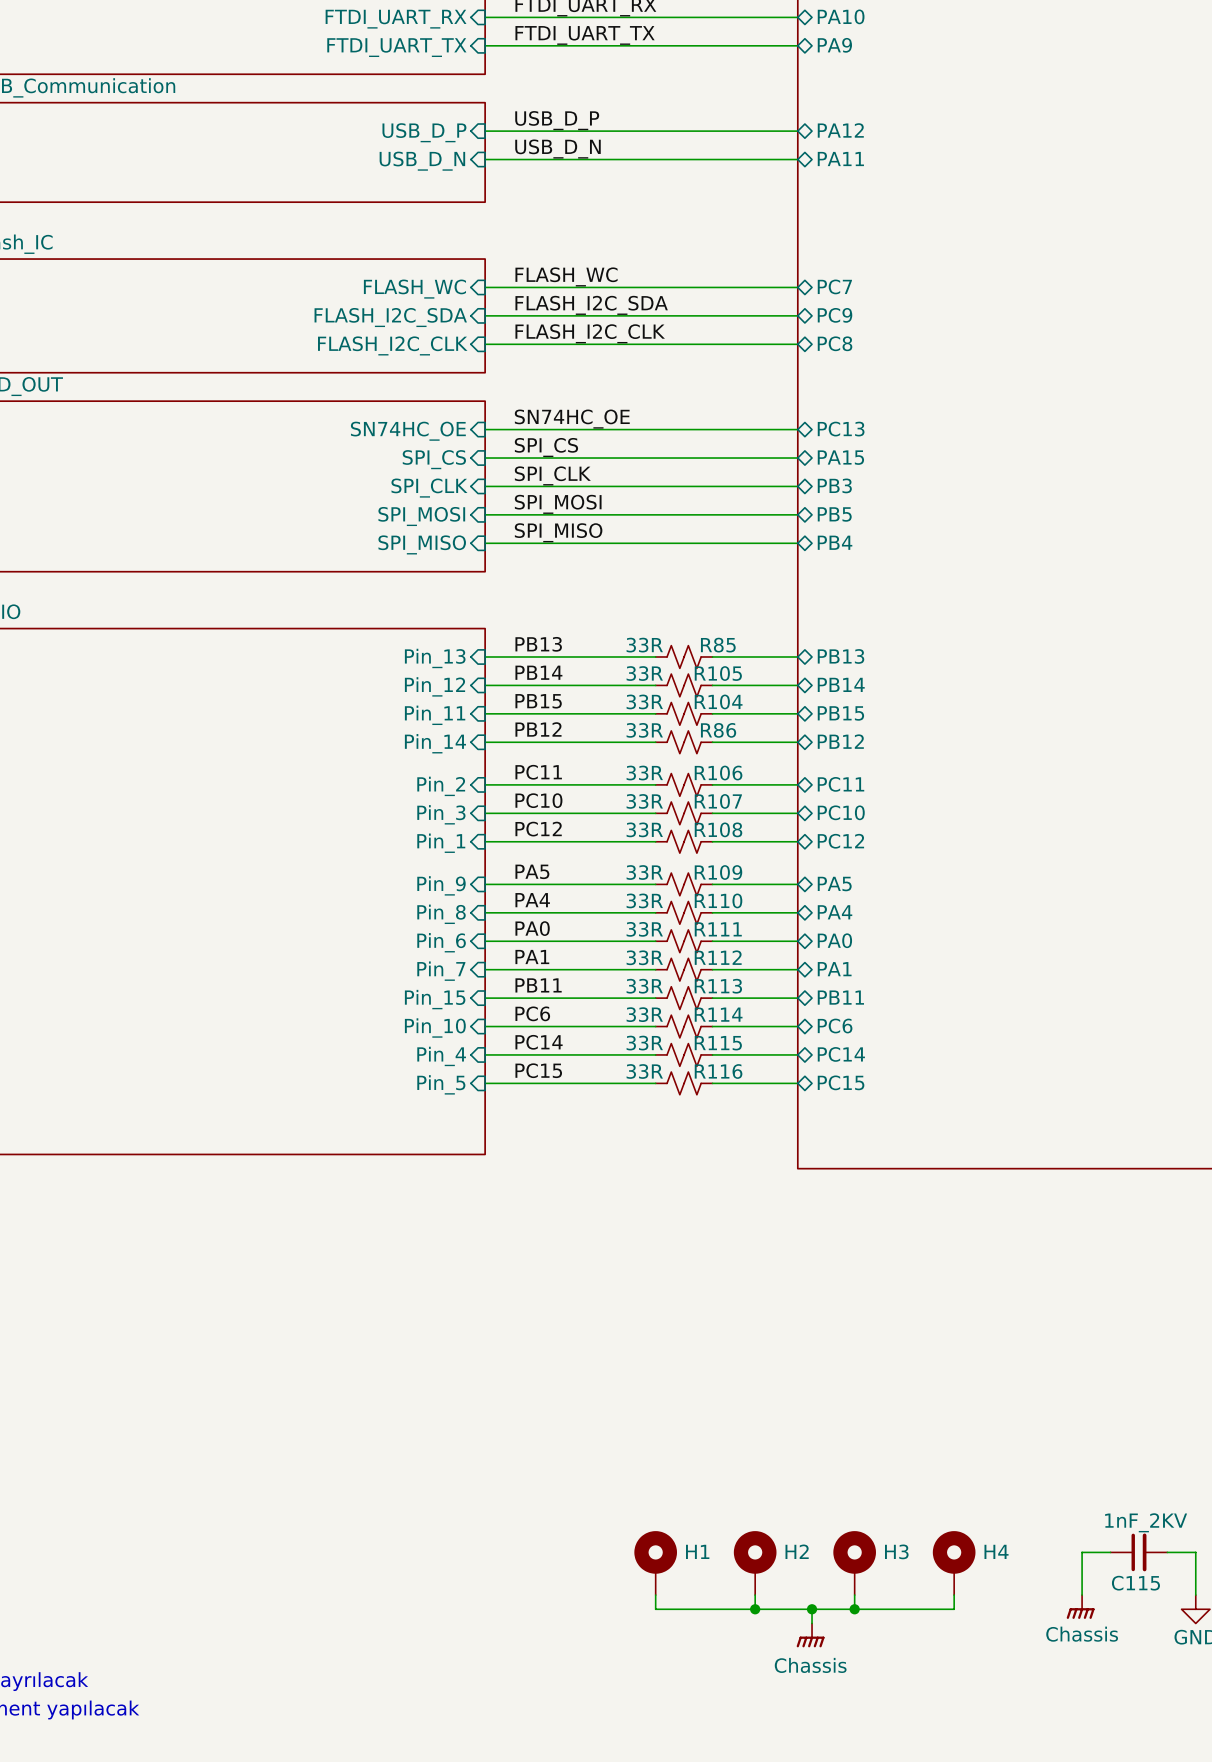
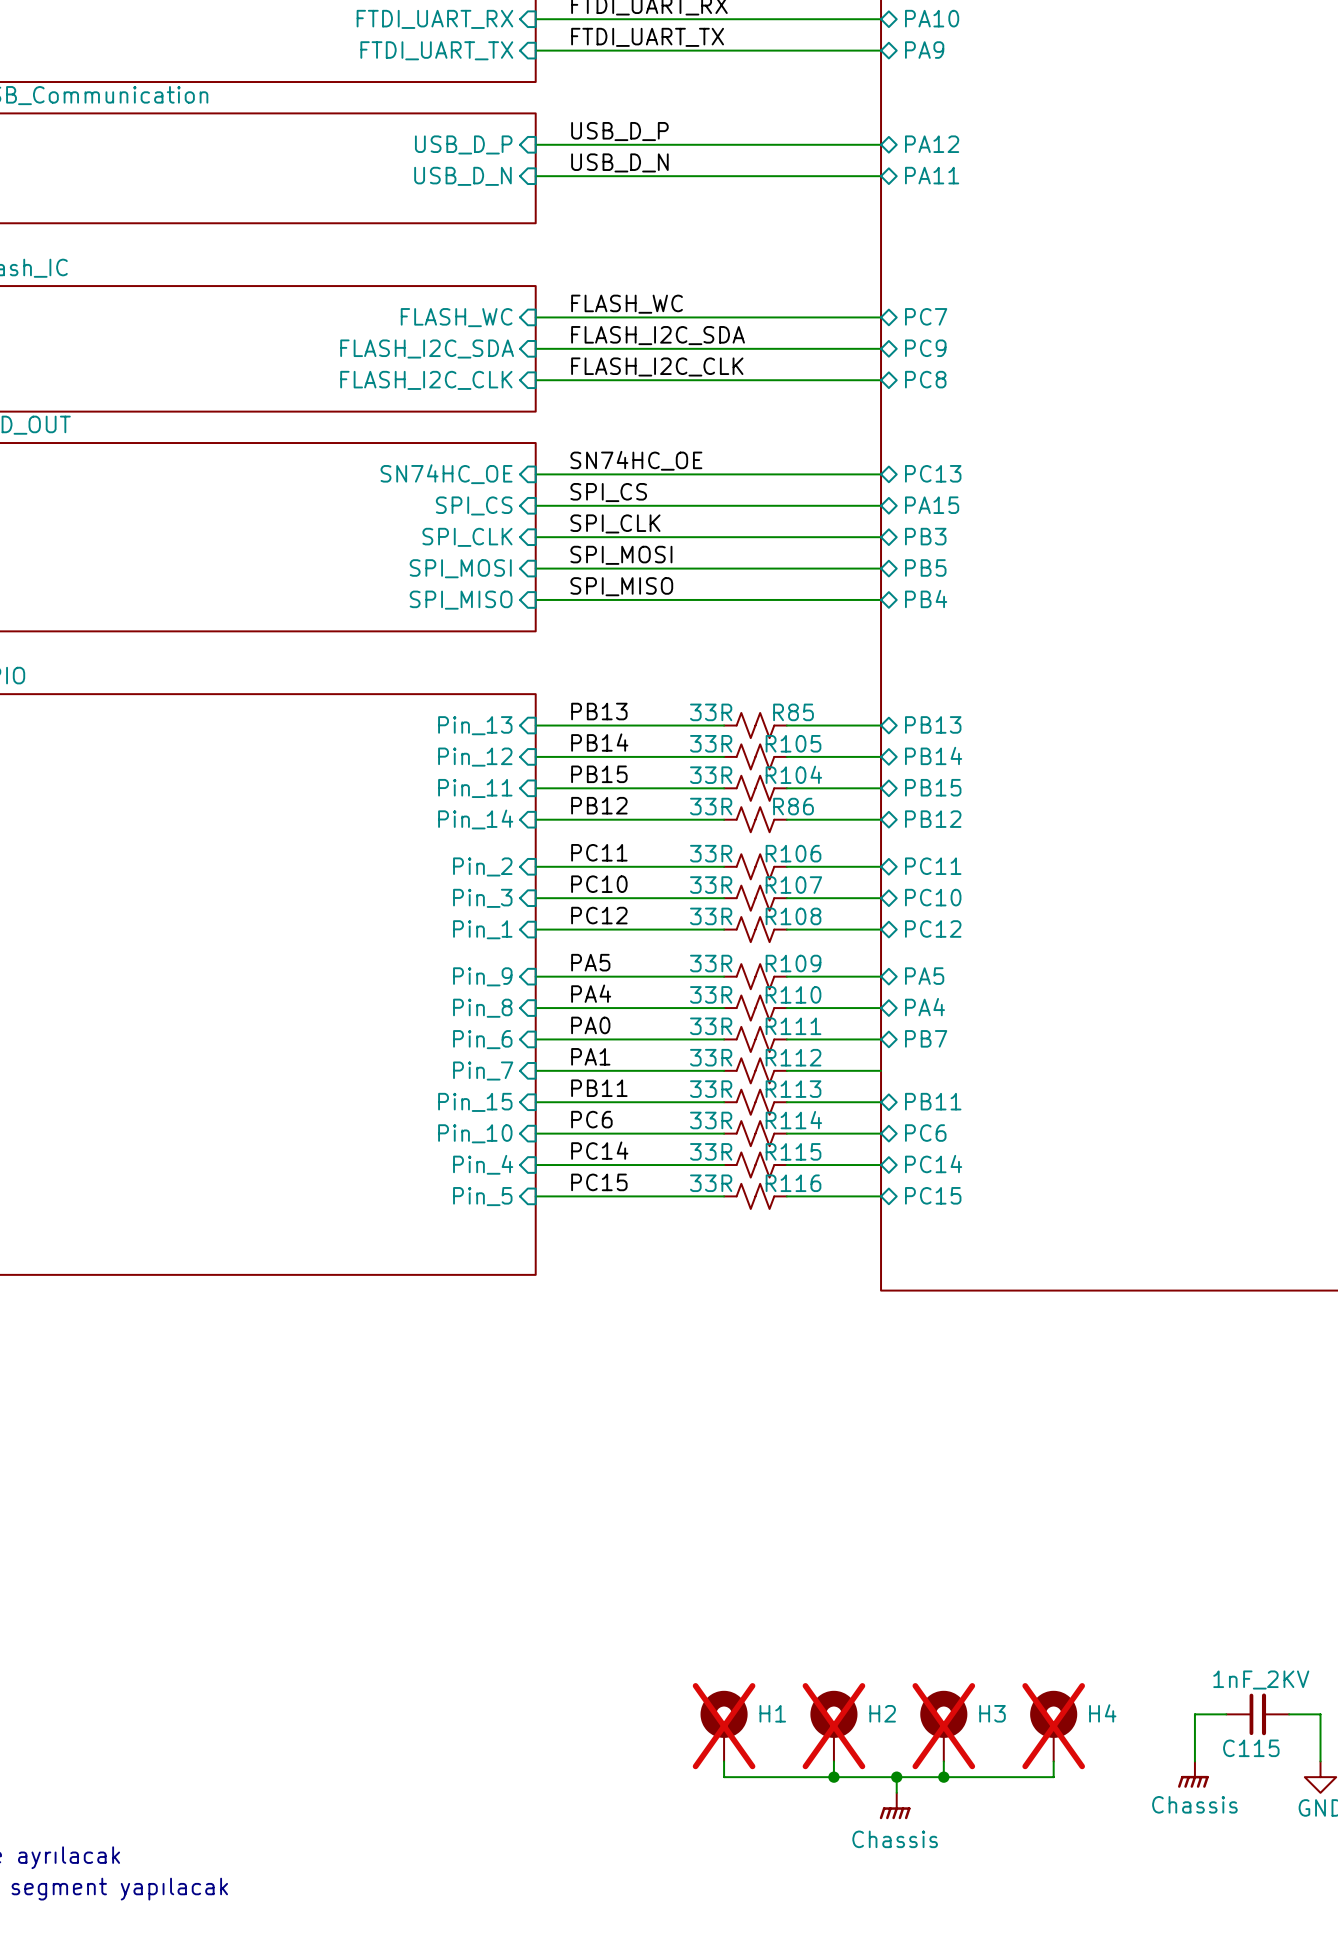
sheet pin: PA0 (834, 940) -> PB7 (926, 1038)
sheet pin: PA1 (834, 969) -> none
H1 do-not-place cross: none -> (724, 1726)
H2 do-not-place cross: none -> (833, 1726)
H3 do-not-place cross: none -> (943, 1726)
H4 do-not-place cross: none -> (1053, 1726)

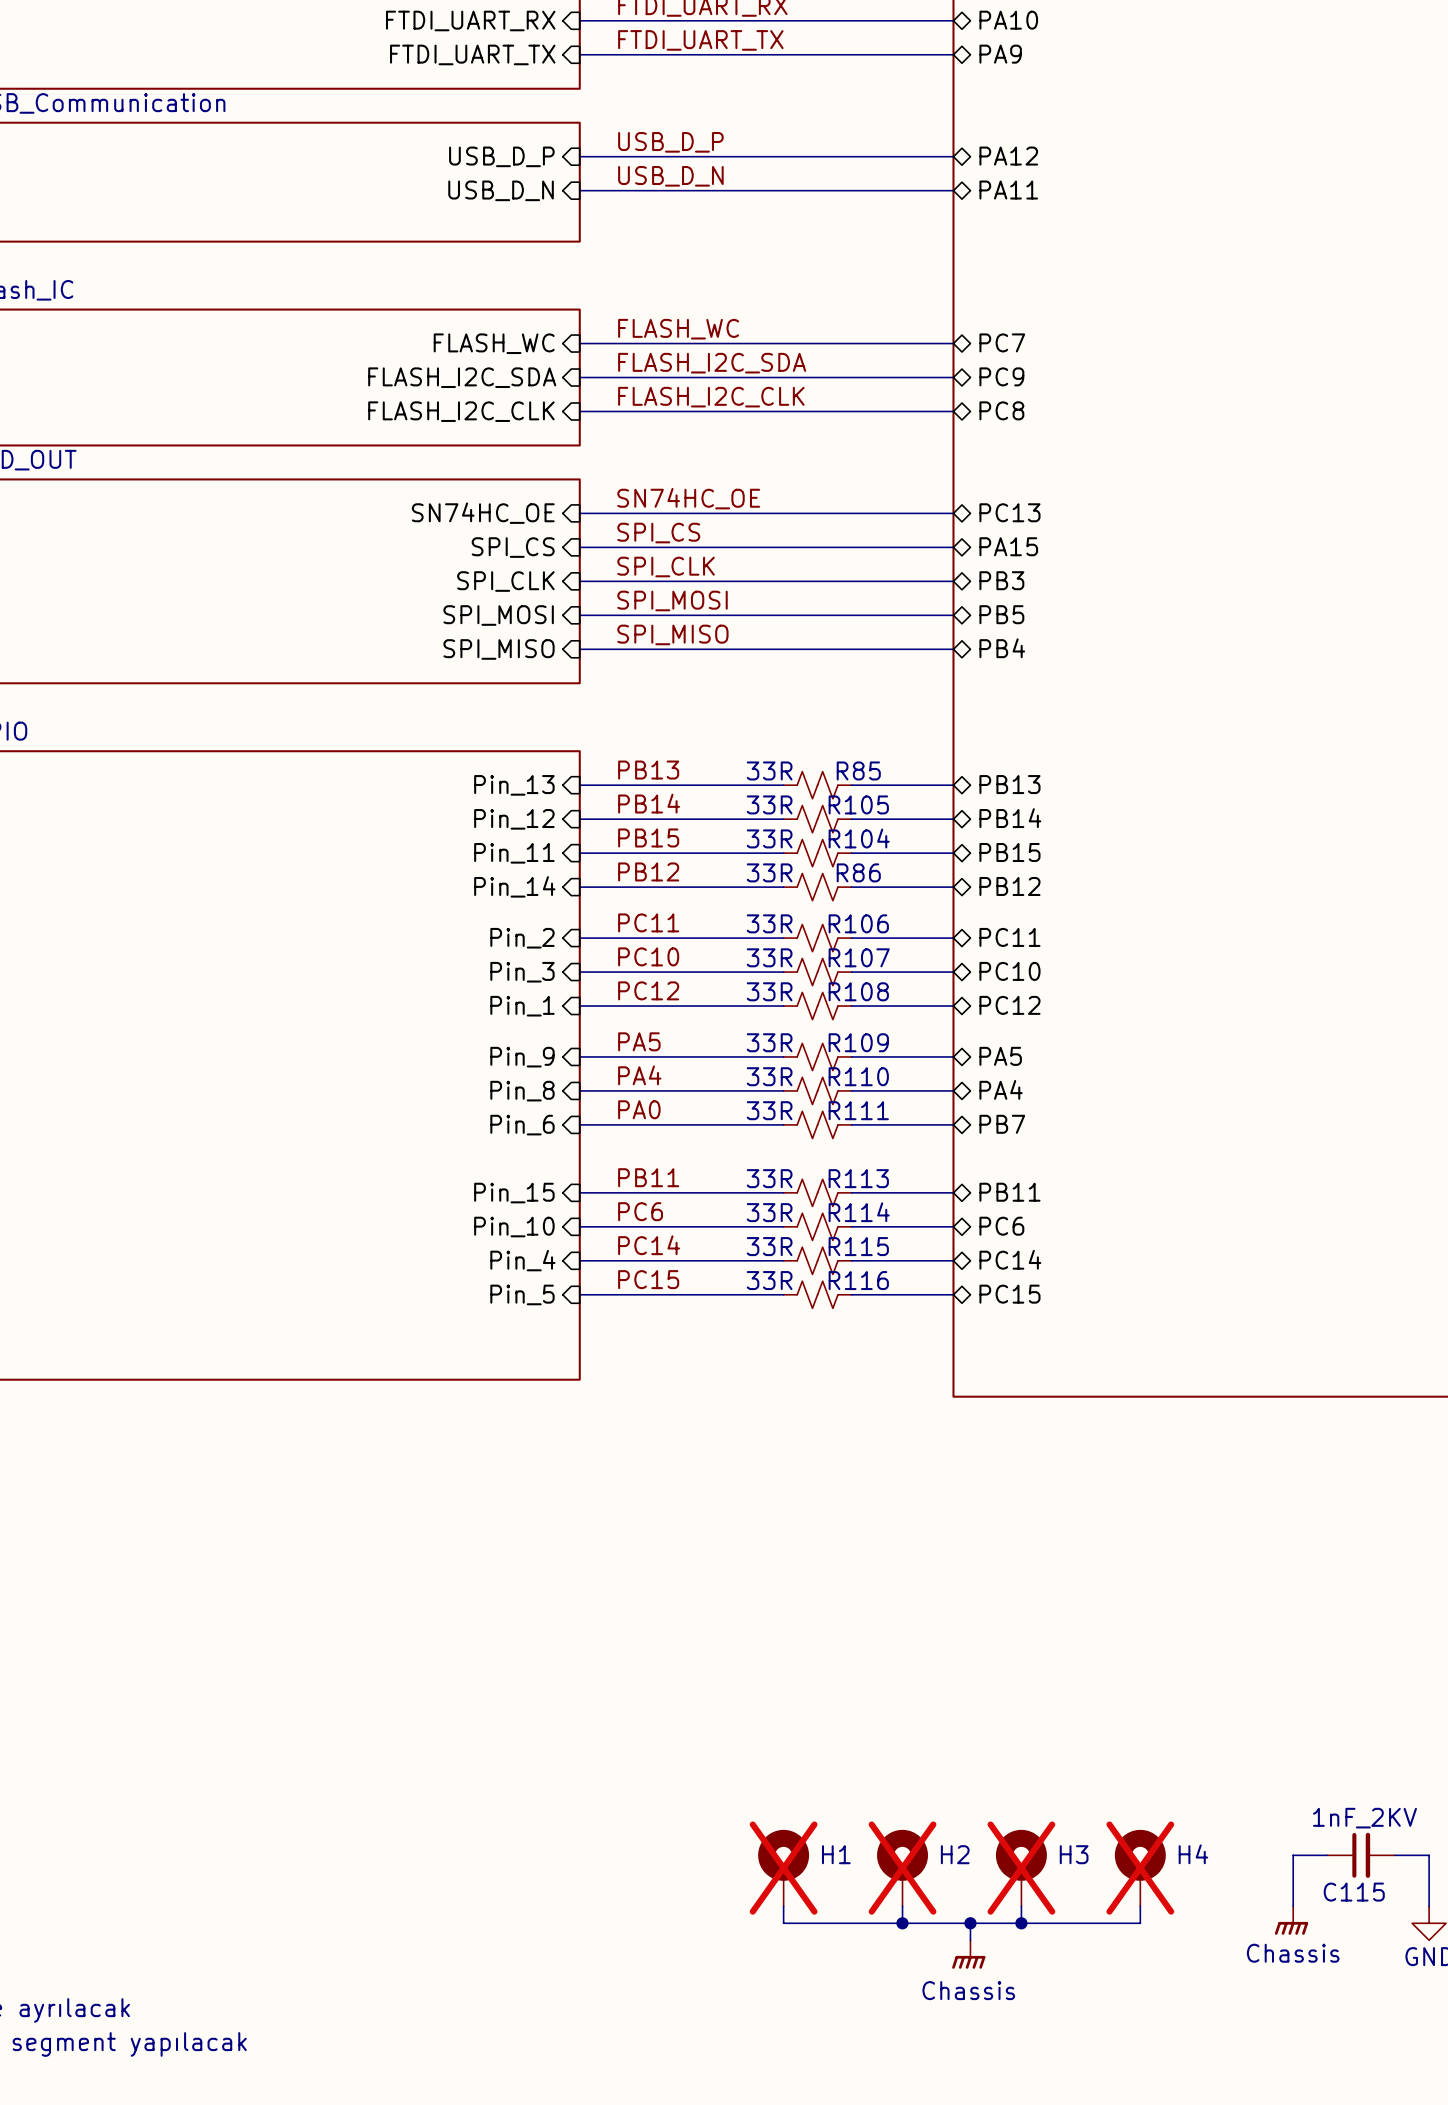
label: PA1 (590, 1056) -> none
wire: (535, 1070) (724, 1070) -> none
R112: 33R (755, 1070) -> none
wire: (786, 1070) (881, 1070) -> none
sheet pin: Pin_7 (483, 1071) -> none

